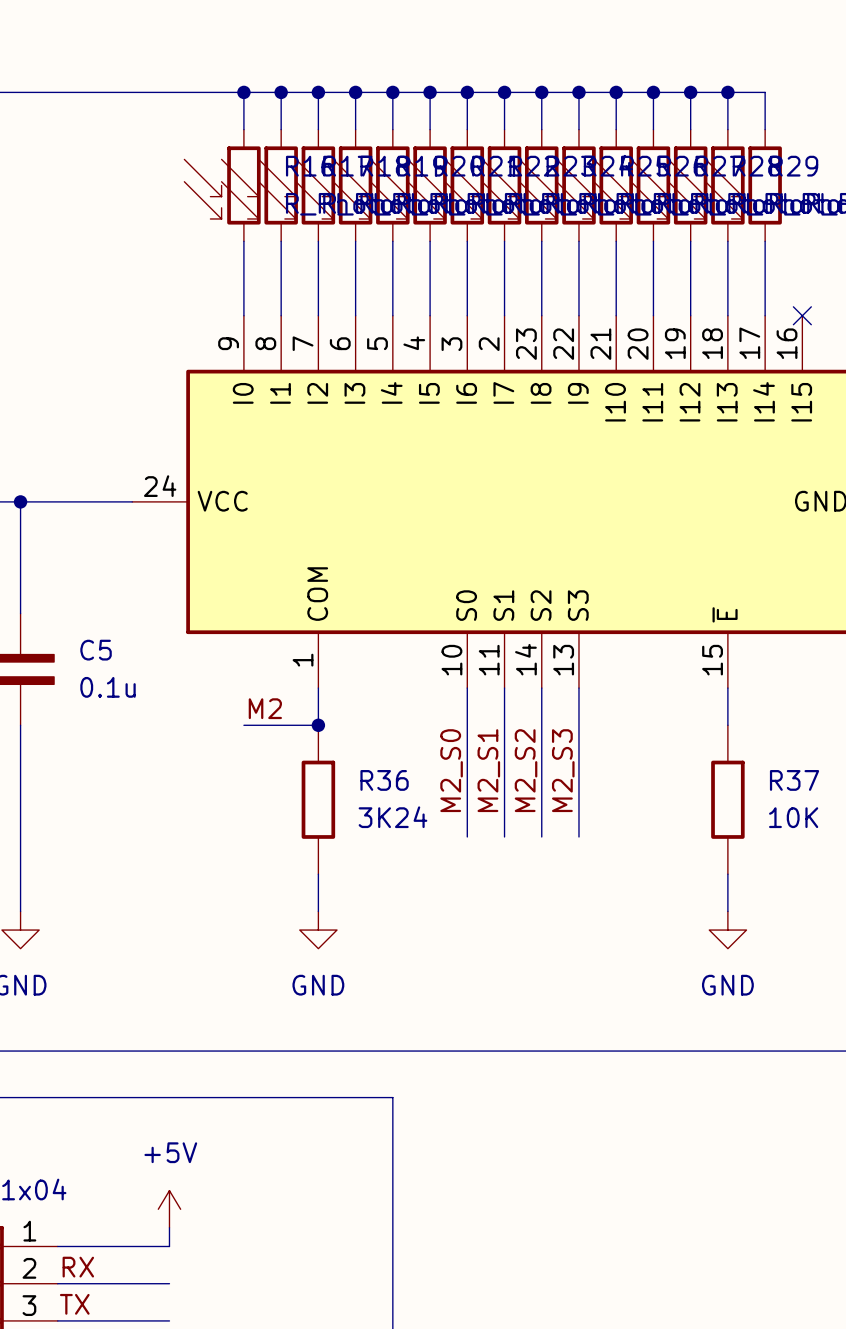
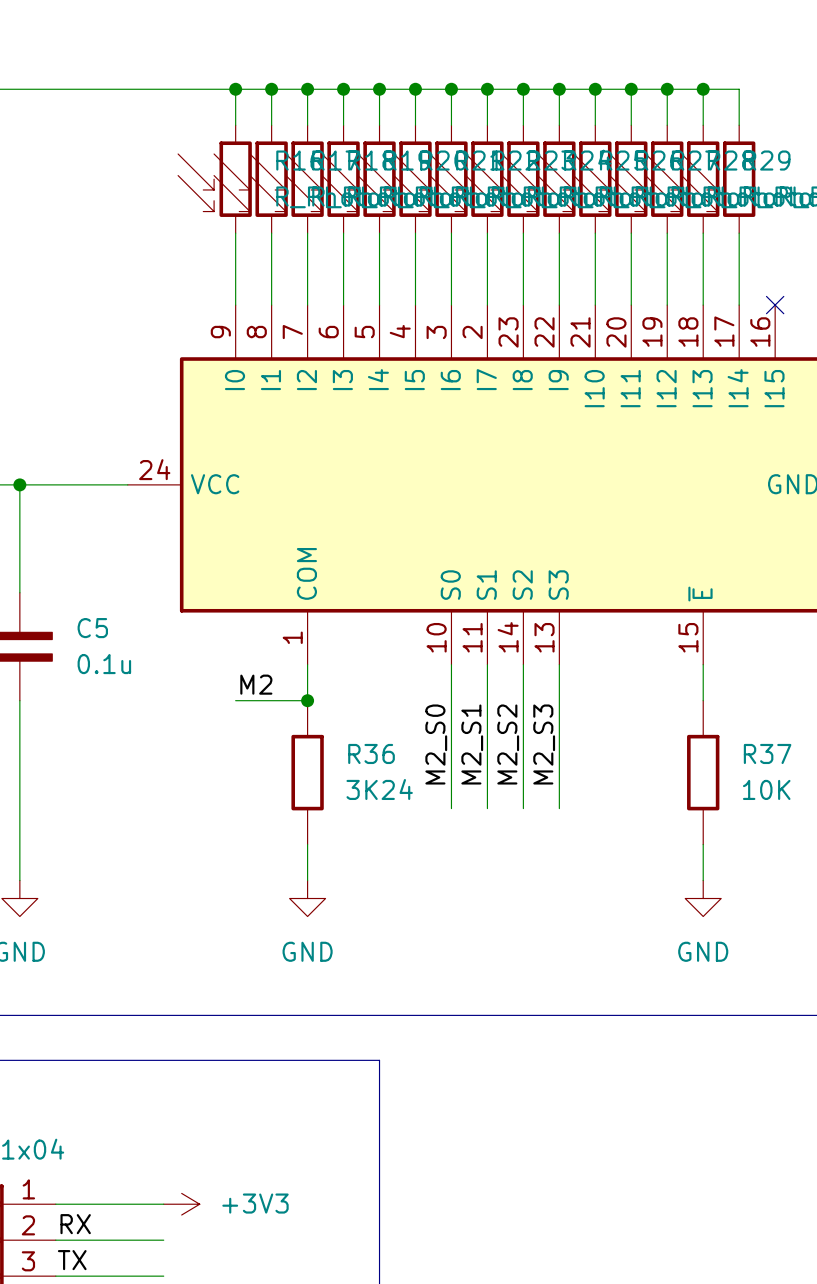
power symbol: +5V (169, 1209) -> none
wire: (169, 1227) (169, 1246) -> none
power symbol: none -> +3V3 (181, 1204)

